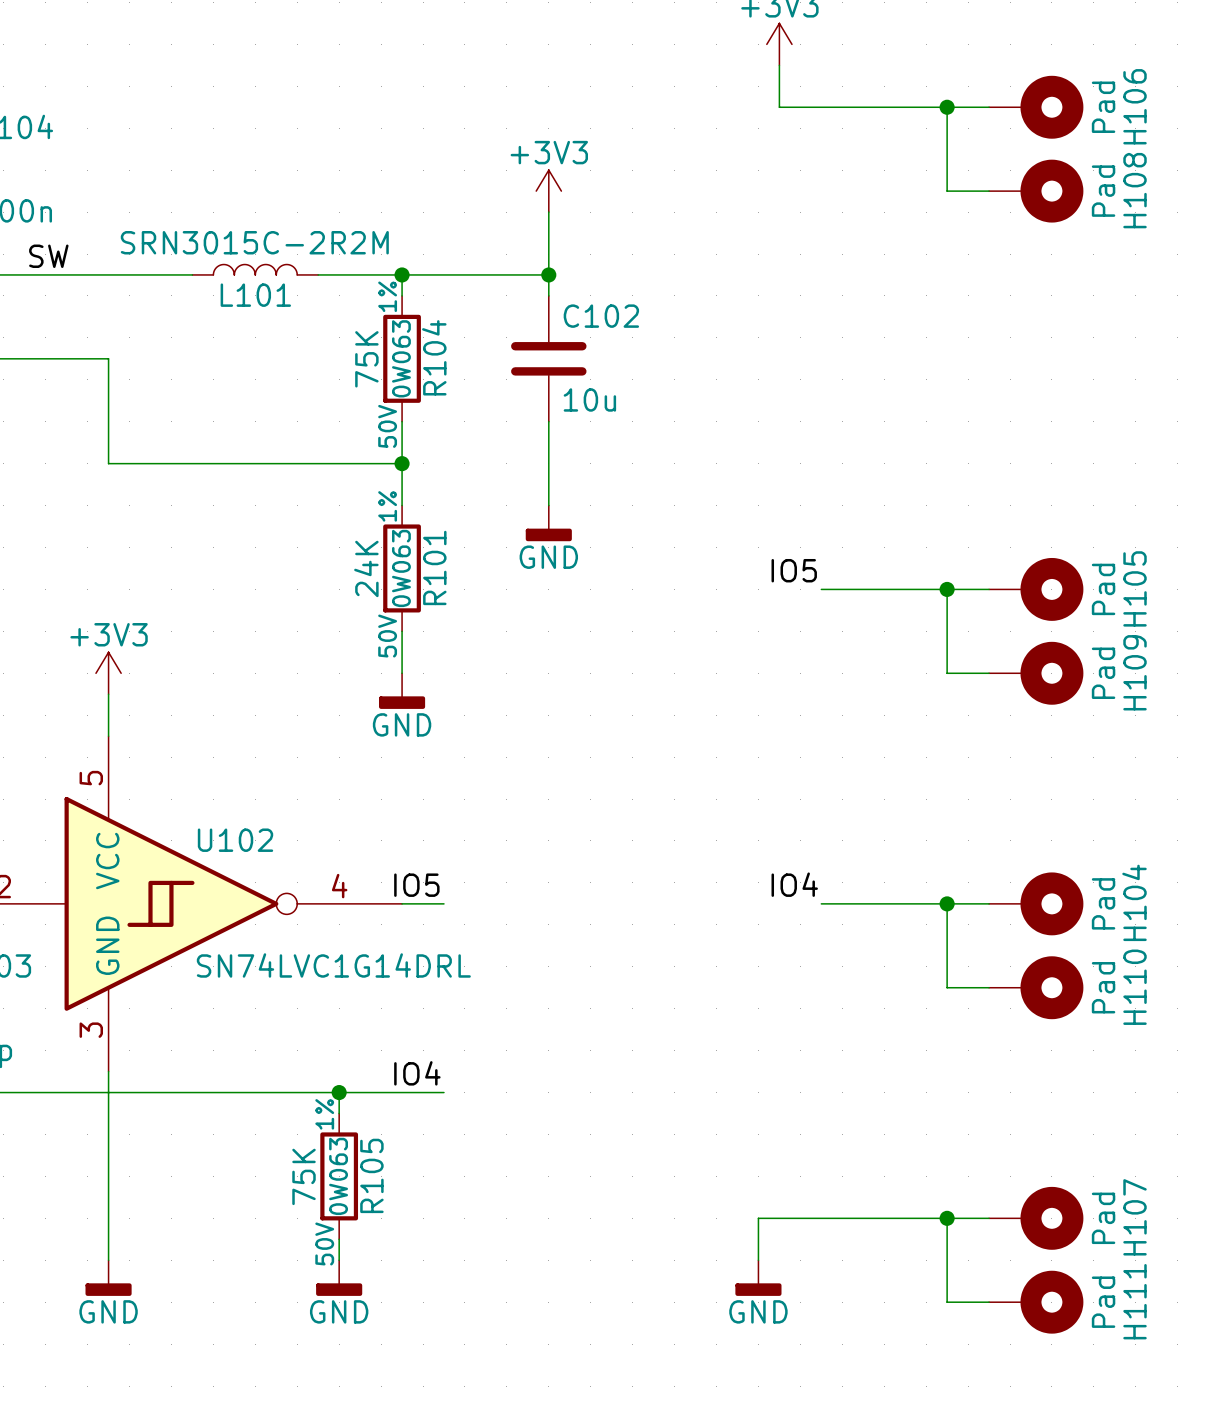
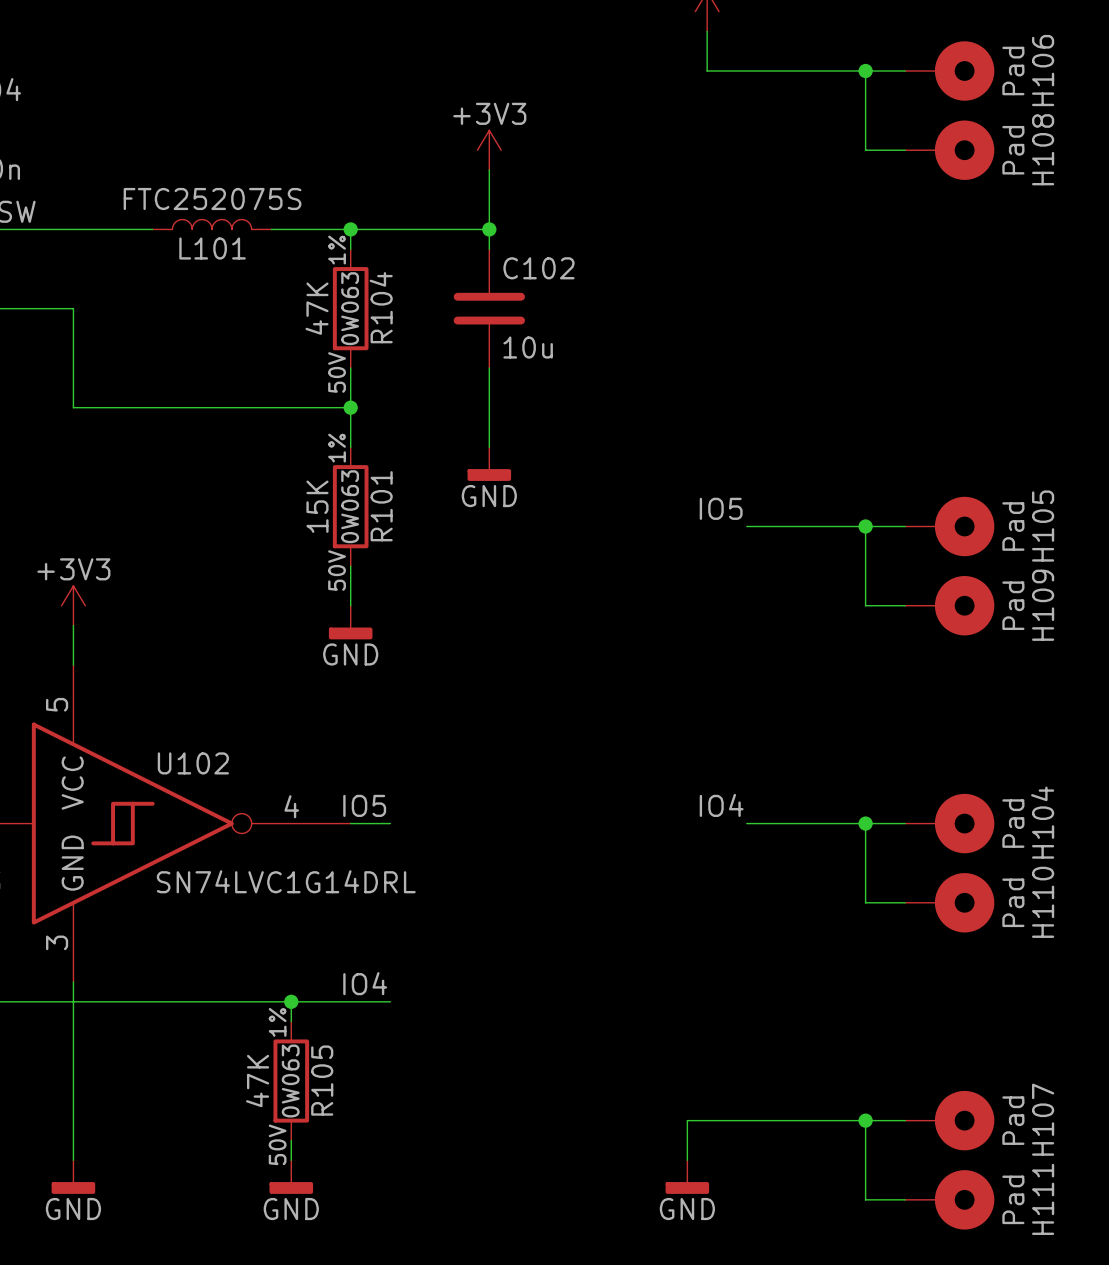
L101 value: SRN3015C-2R2M (254, 242) -> FTC252075S (212, 198)
R104 text: 75K (366, 359) -> 47K (317, 308)
R101 text: 24K (366, 568) -> 15K (317, 506)
R105 text: 75K (304, 1176) -> 47K (257, 1081)

